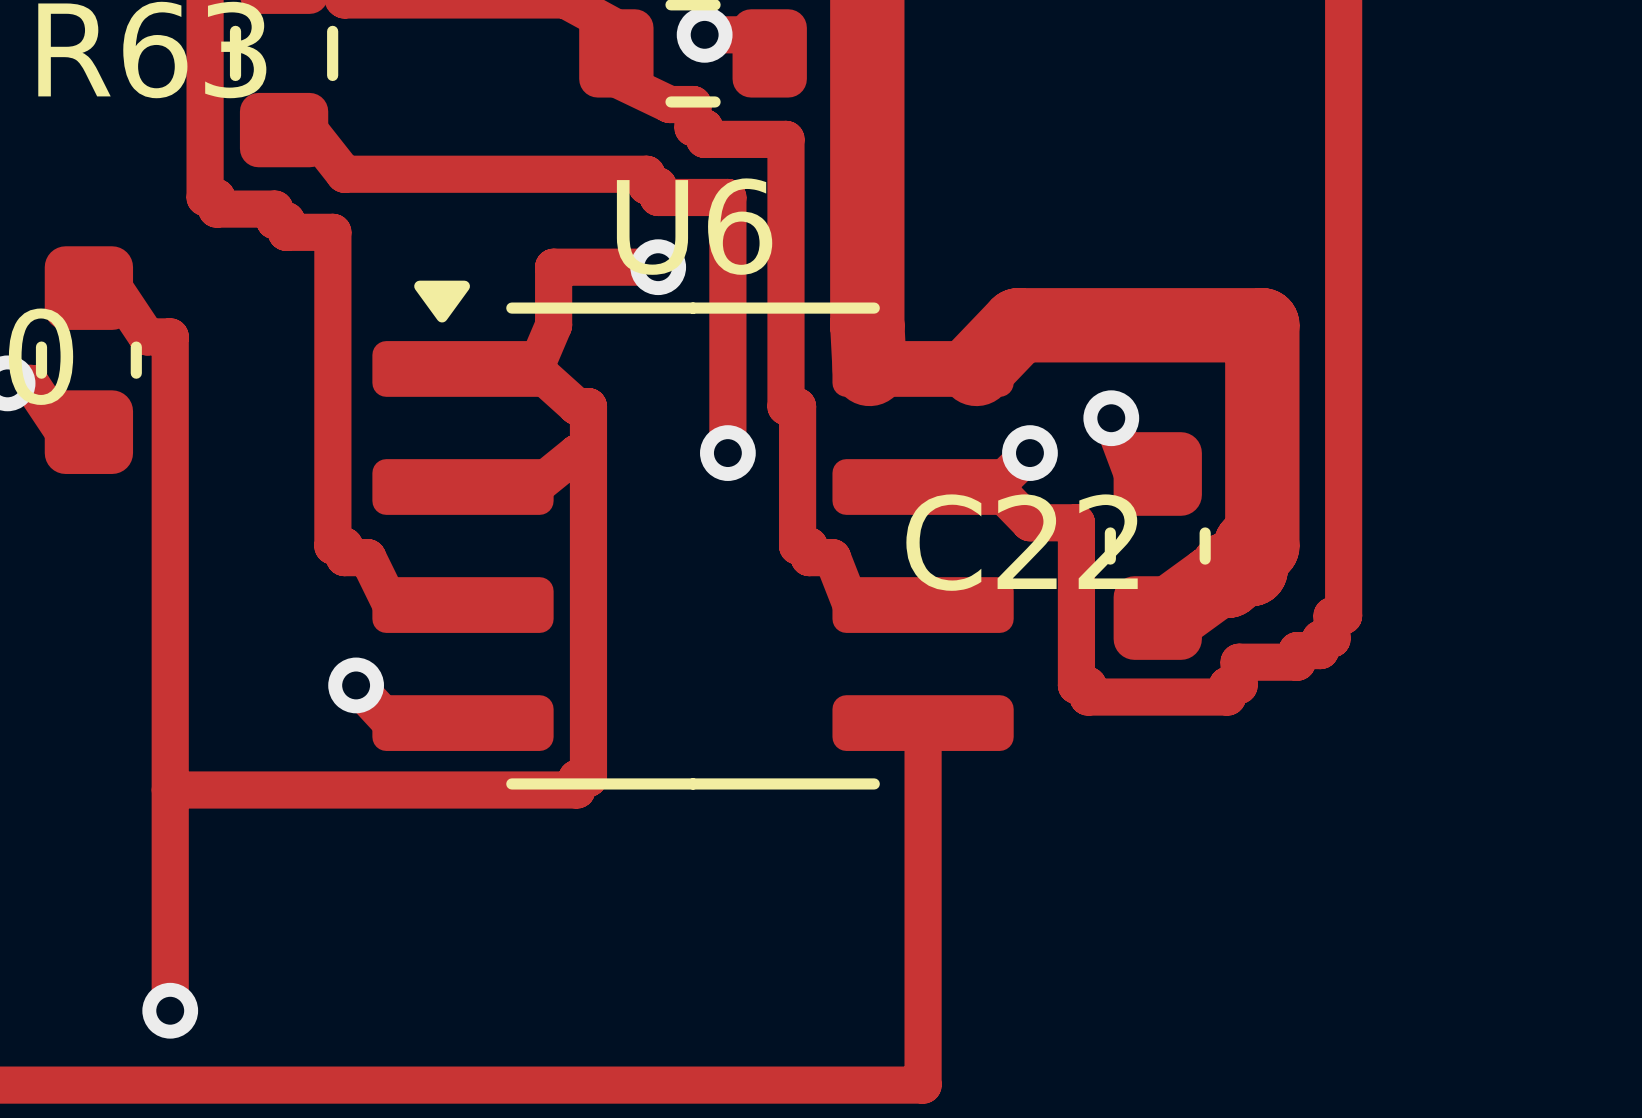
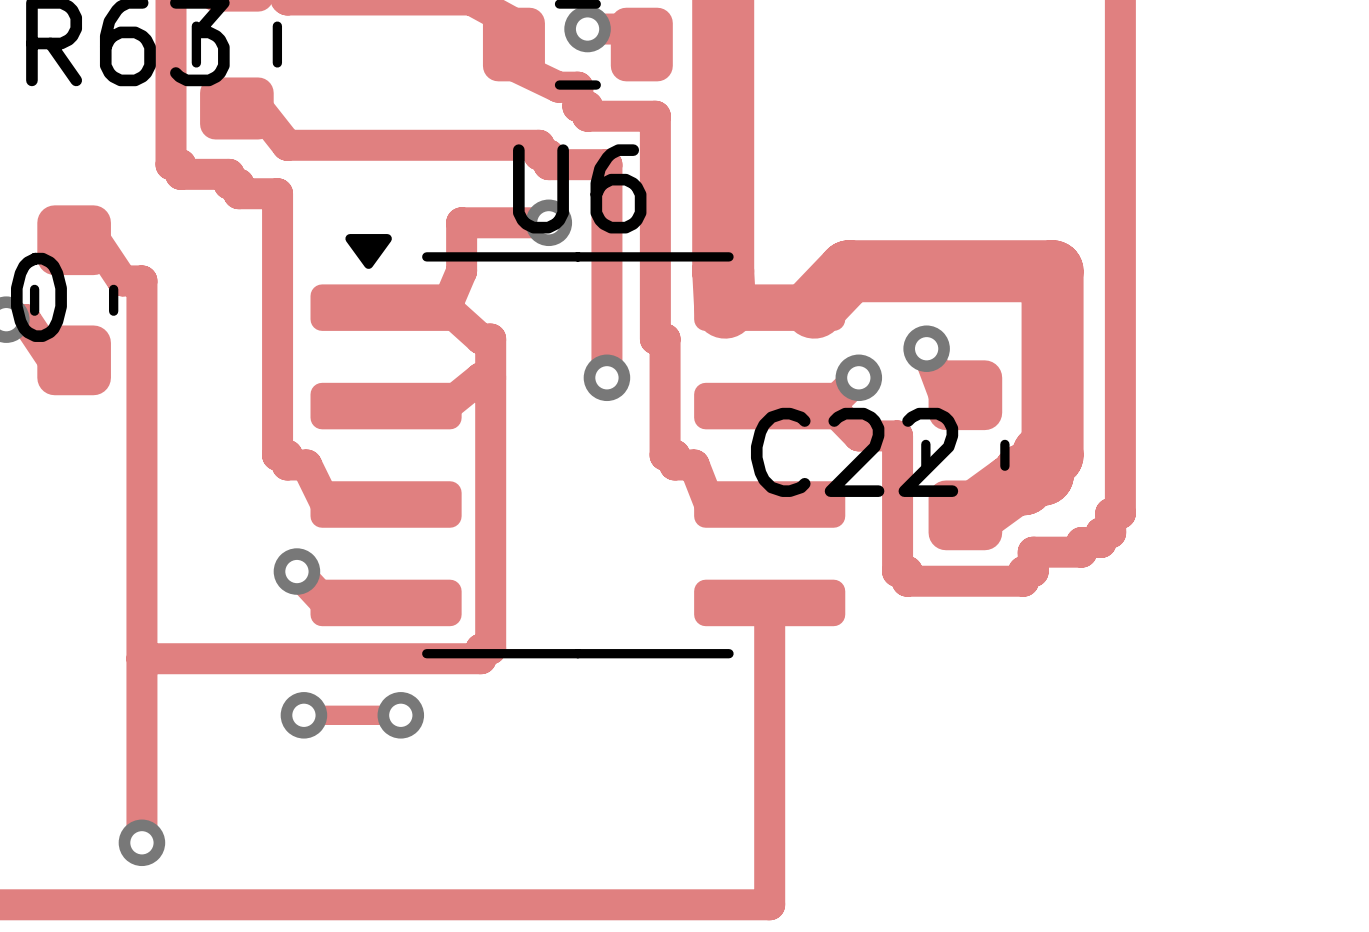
track: none -> (303, 715) (400, 715)
via: none -> (303, 715)
via: none -> (400, 715)

